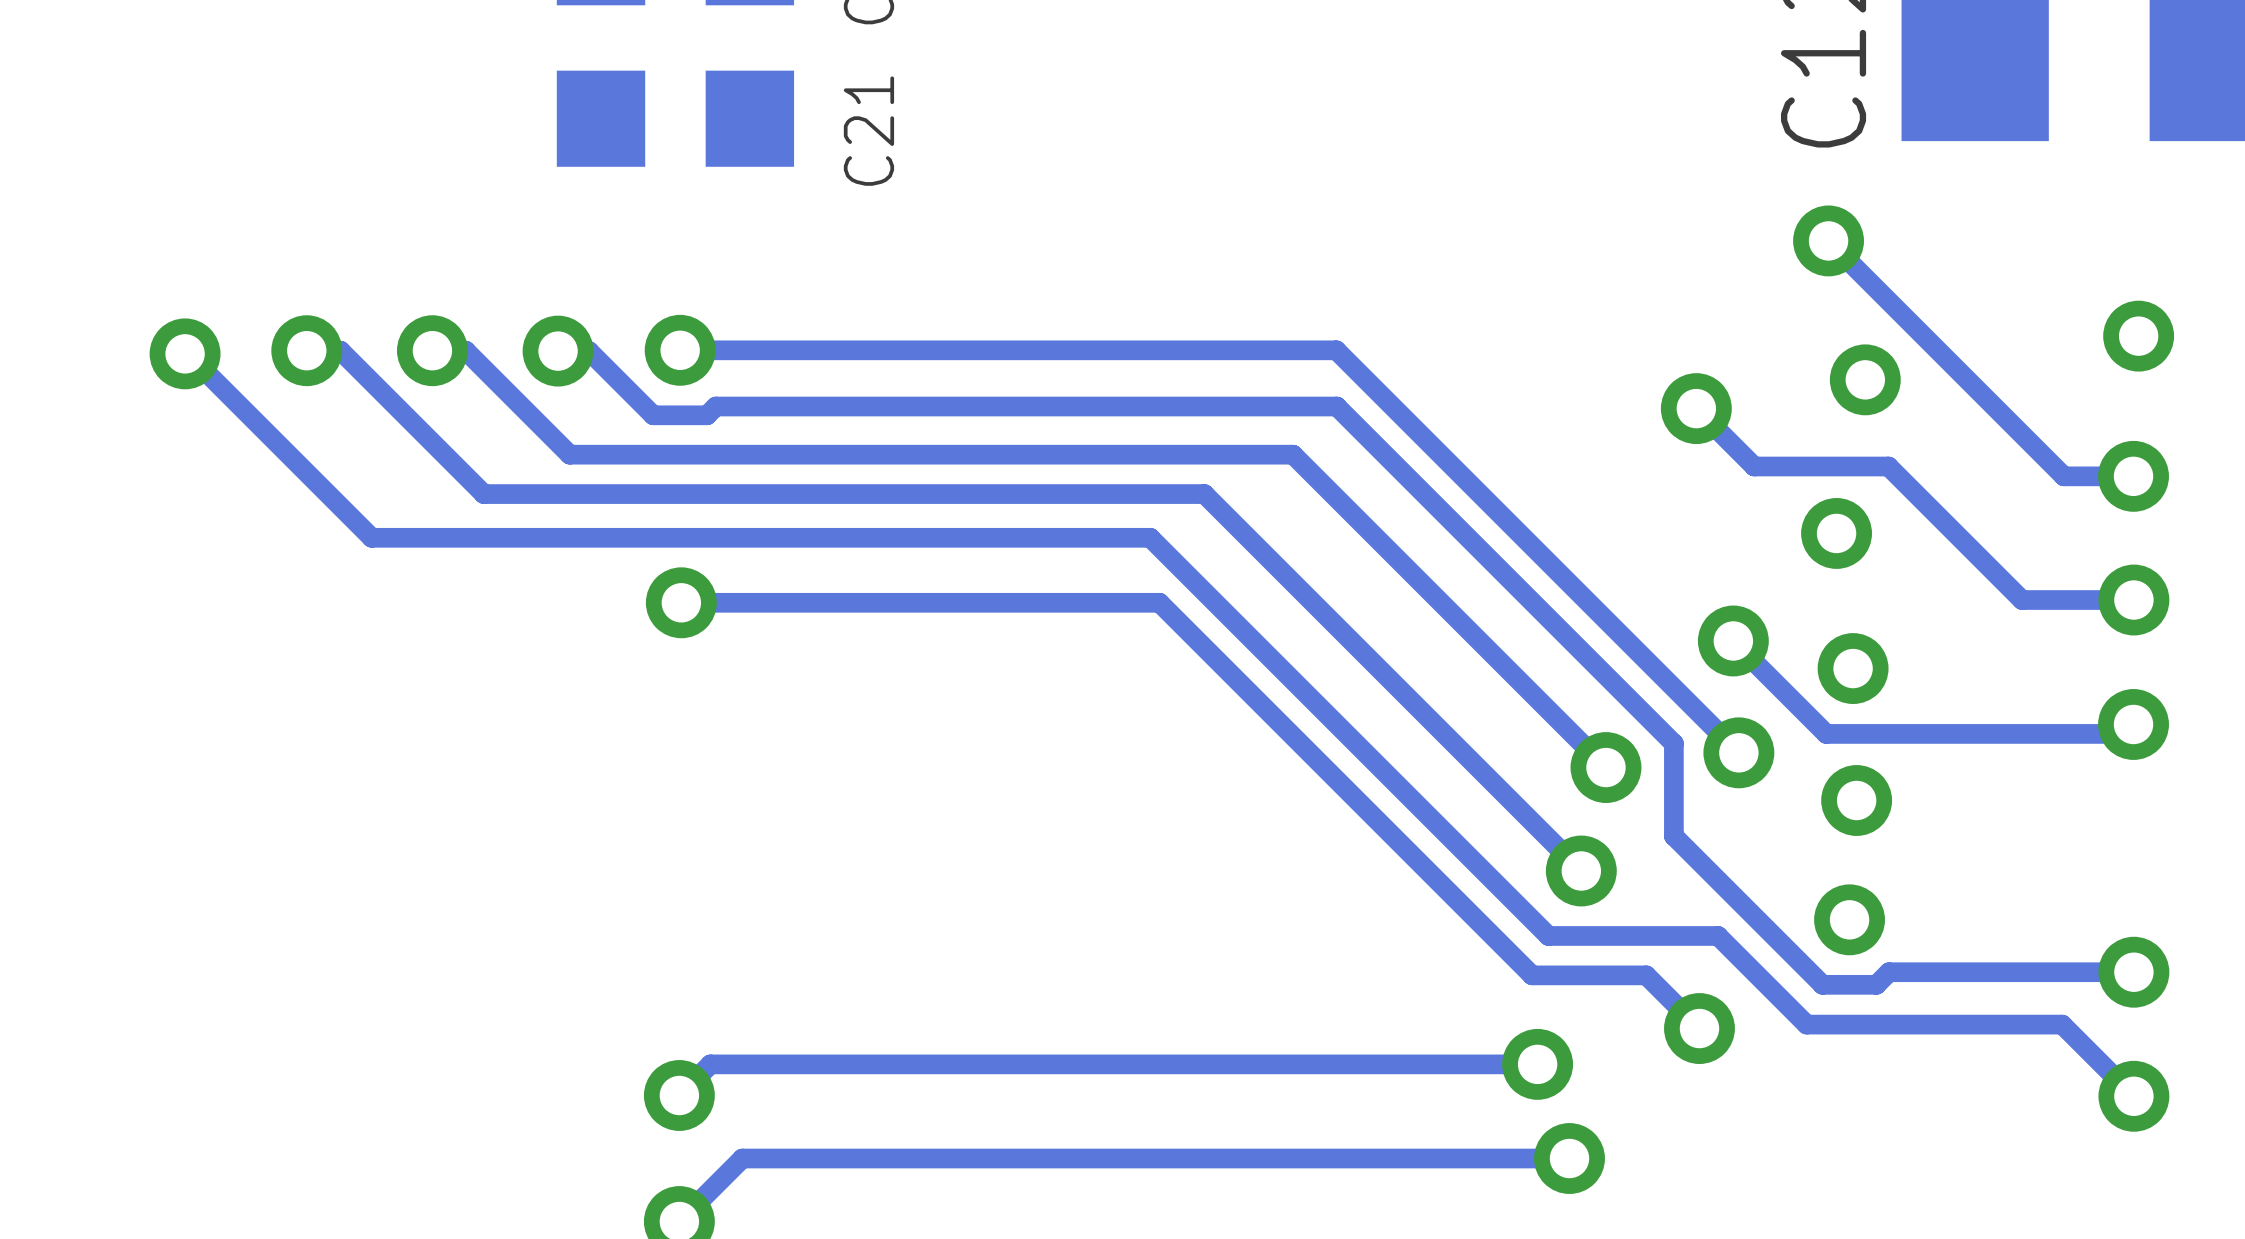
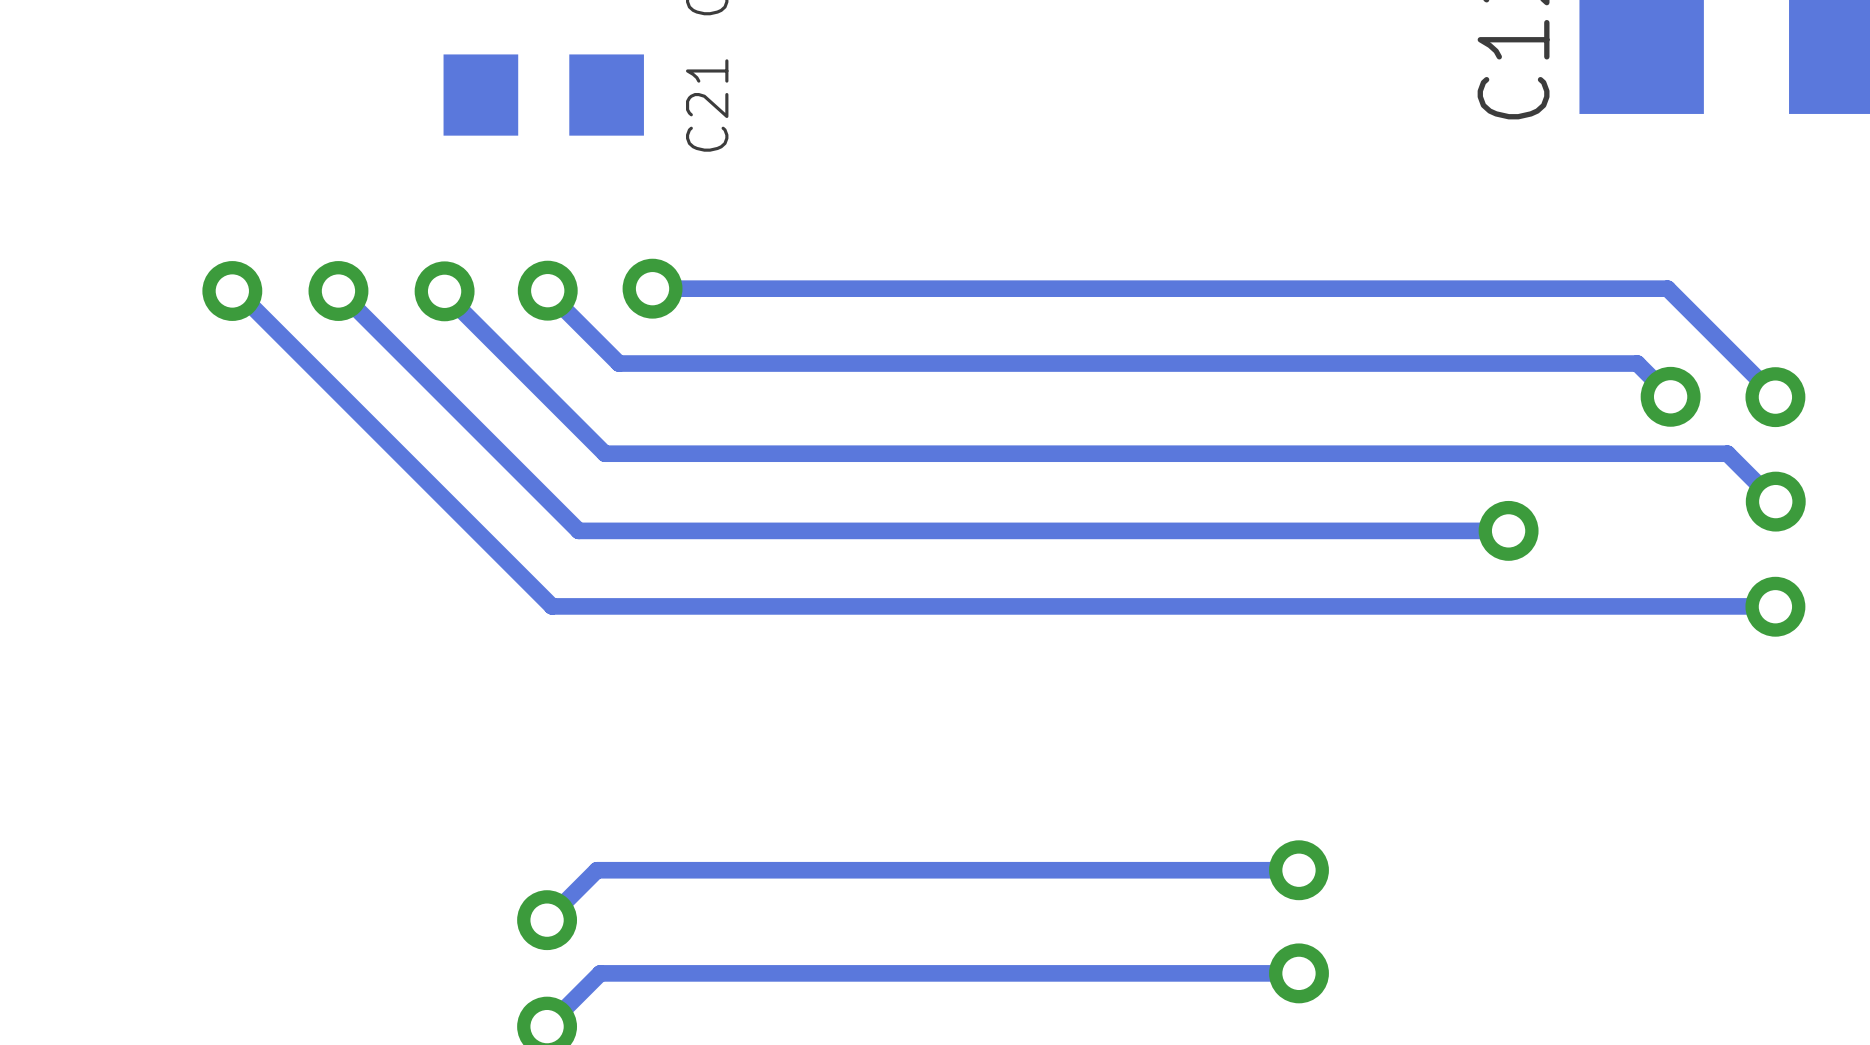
track: (1828, 240) (2063, 476) (2133, 476) -> (652, 288) (1667, 288) (1775, 396)
via: (1828, 240) -> none
via: (2138, 336) -> none
track: (306, 350) (340, 350) (483, 494) (1204, 494) (1581, 870) -> (235, 290) (552, 606) (1775, 606)
track: (432, 350) (465, 350) (569, 454) (1293, 454) (1605, 767) -> (338, 290) (578, 530) (1508, 530)
track: (680, 350) (1336, 350) (1738, 752) -> (546, 291) (618, 363) (1637, 363) (1670, 396)
track: (558, 351) (589, 351) (653, 415) (707, 415) (715, 406) (1336, 406) (1673, 743) (1673, 836) (1822, 984) (1876, 984) (1889, 972) (2133, 972) -> (442, 291) (604, 453) (1727, 453) (1775, 501)
via: (185, 353) -> none
track: (187, 353) (371, 537) (1150, 537) (1548, 935) (1718, 935) (1806, 1024) (2062, 1024) (2133, 1096) -> none
via: (1865, 379) -> none
track: (1696, 408) (1754, 466) (1888, 466) (2022, 600) (2133, 600) -> none
via: (1696, 408) -> none
via: none -> (1670, 396)
via: (1836, 533) -> none
track: (681, 602) (1159, 602) (1532, 975) (1646, 975) (1699, 1028) -> none
via position: (681, 602) -> (652, 288)
track: (1733, 640) (1826, 733) (2124, 733) (2133, 724) -> none
via: (1733, 640) -> none
via position: (1853, 668) -> (1508, 530)
via: (1738, 752) -> none
via: (1605, 767) -> none
via: (1856, 800) -> none
via: (1581, 870) -> none
via: (1849, 919) -> none
via: (2133, 972) -> none
via: (1699, 1028) -> none
track: (1537, 1064) (710, 1064) -> (1298, 870) (596, 870) (573, 893)
via position: (1537, 1064) -> (1298, 870)
via: (2133, 1096) -> none

